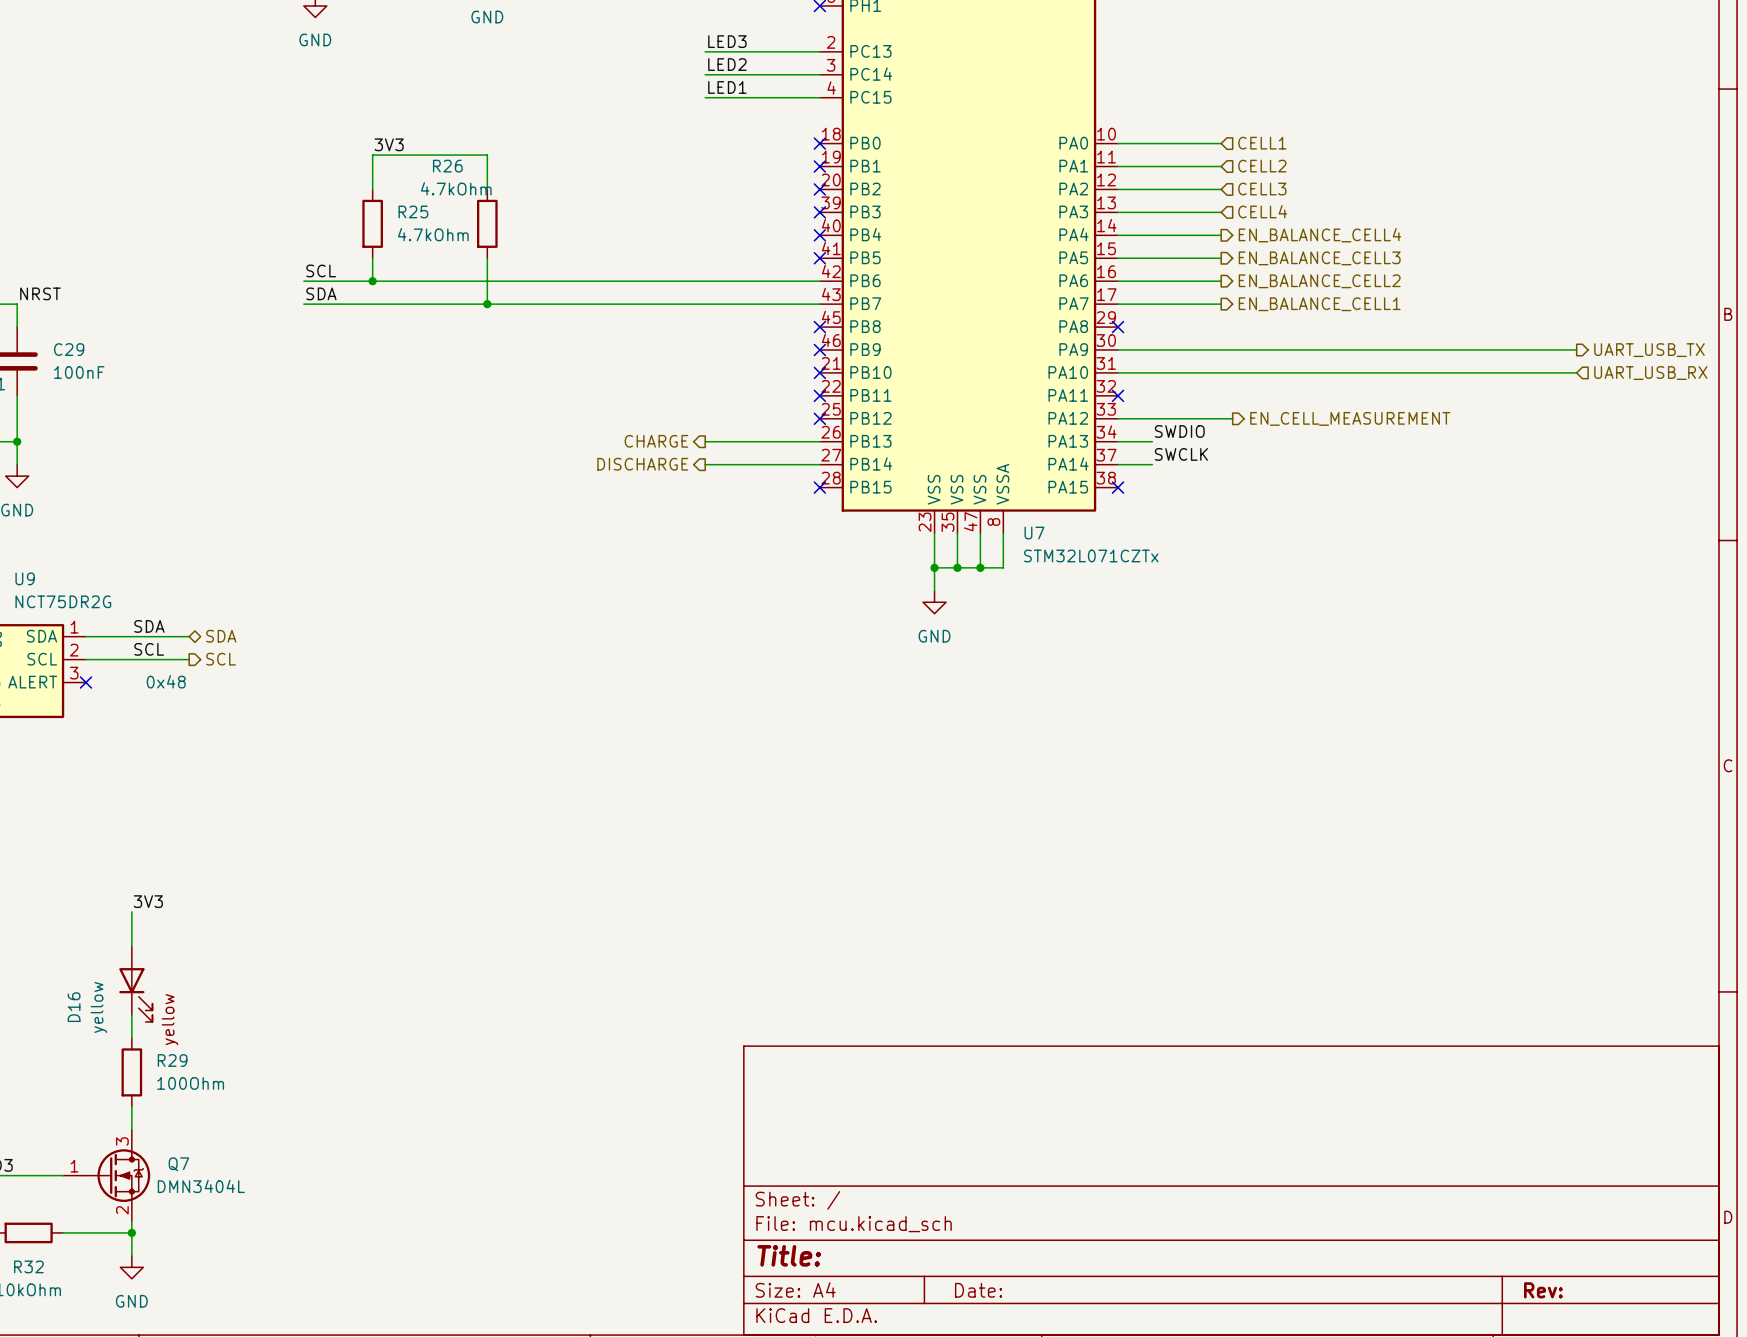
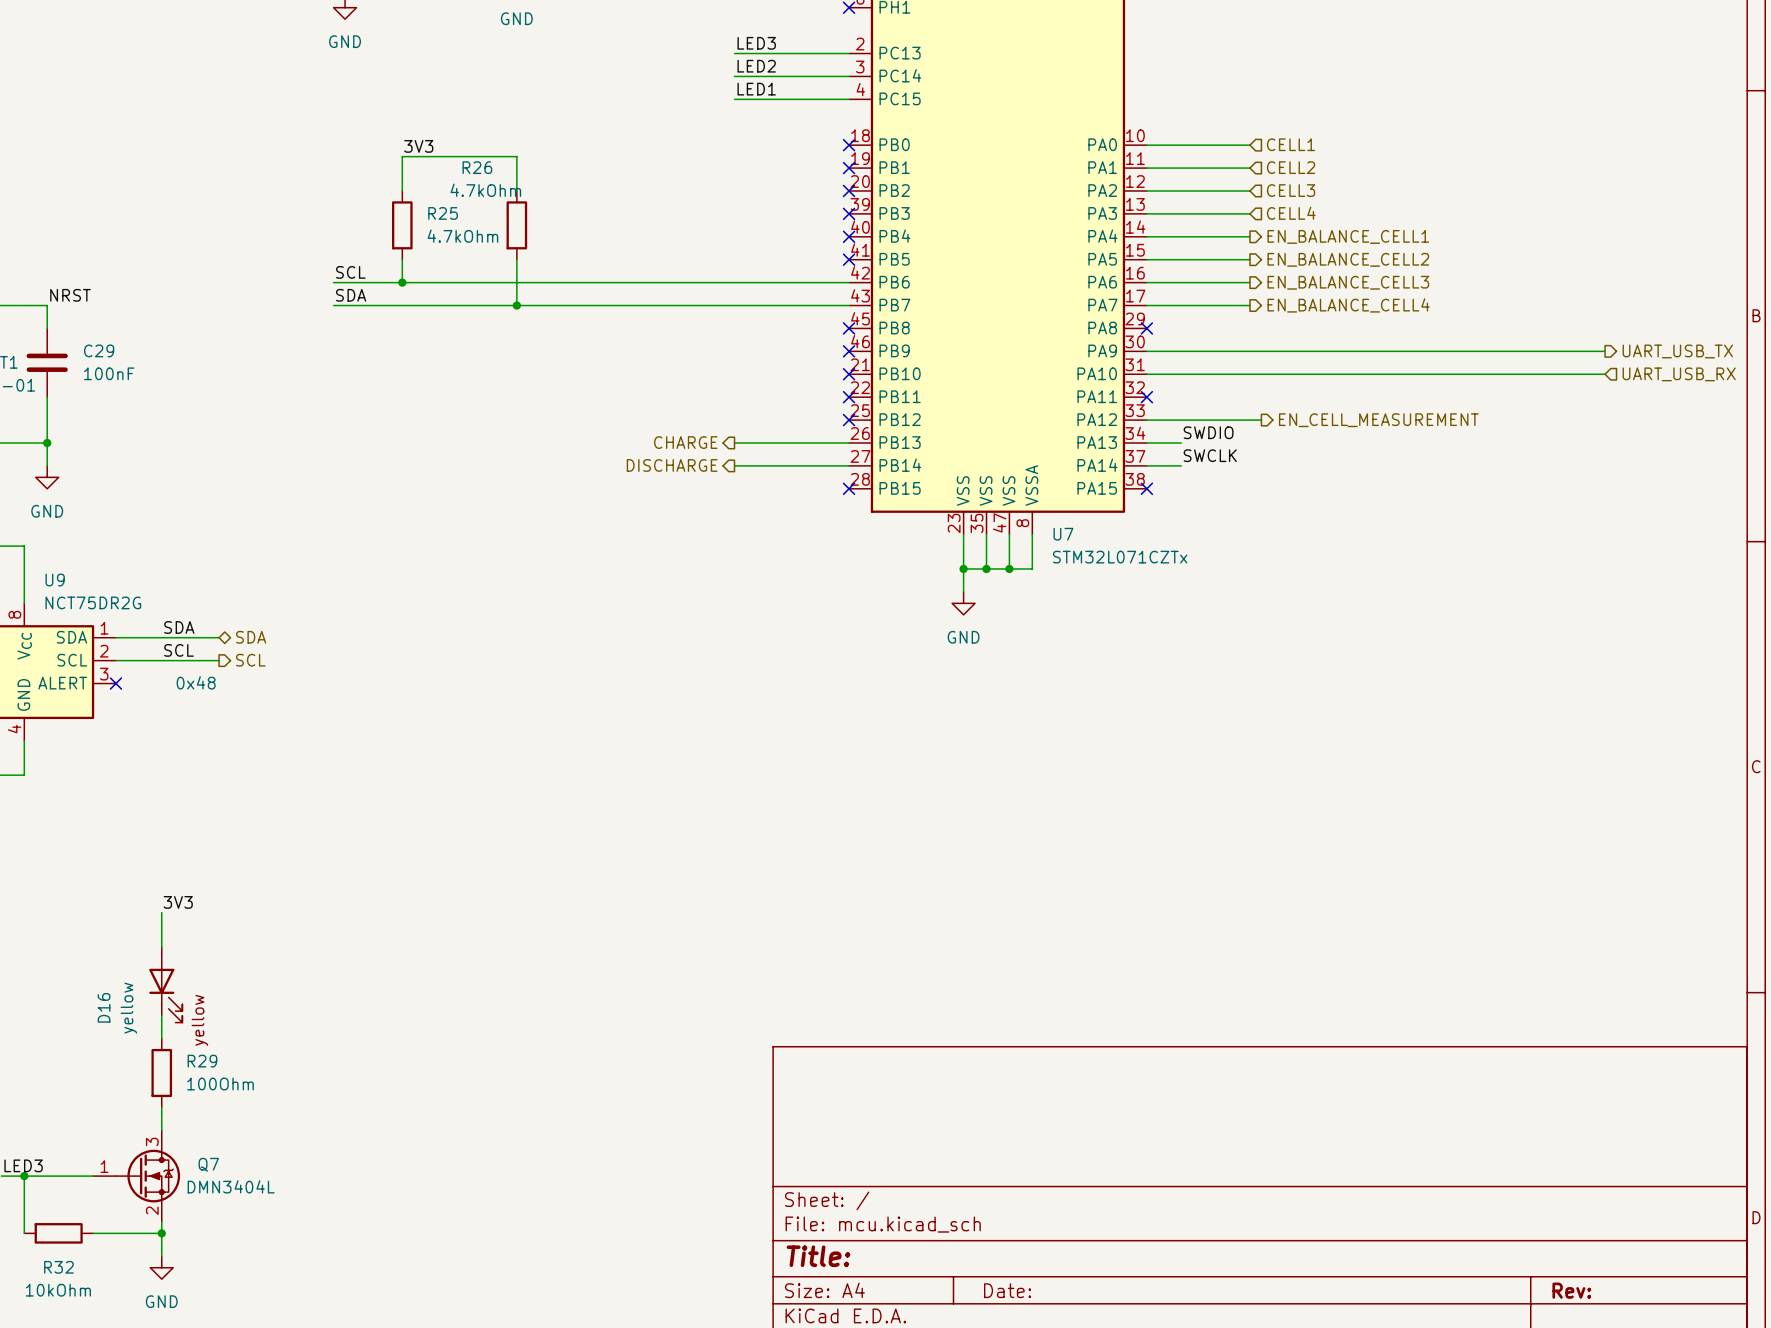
hierarchical label: EN_BALANCE_CELL4 (1319, 235) -> EN_BALANCE_CELL1 (1348, 236)
hierarchical label: EN_BALANCE_CELL3 (1319, 258) -> EN_BALANCE_CELL2 (1348, 259)
hierarchical label: EN_BALANCE_CELL2 (1319, 281) -> EN_BALANCE_CELL3 (1348, 282)
hierarchical label: EN_BALANCE_CELL1 (1319, 304) -> EN_BALANCE_CELL4 (1348, 305)

